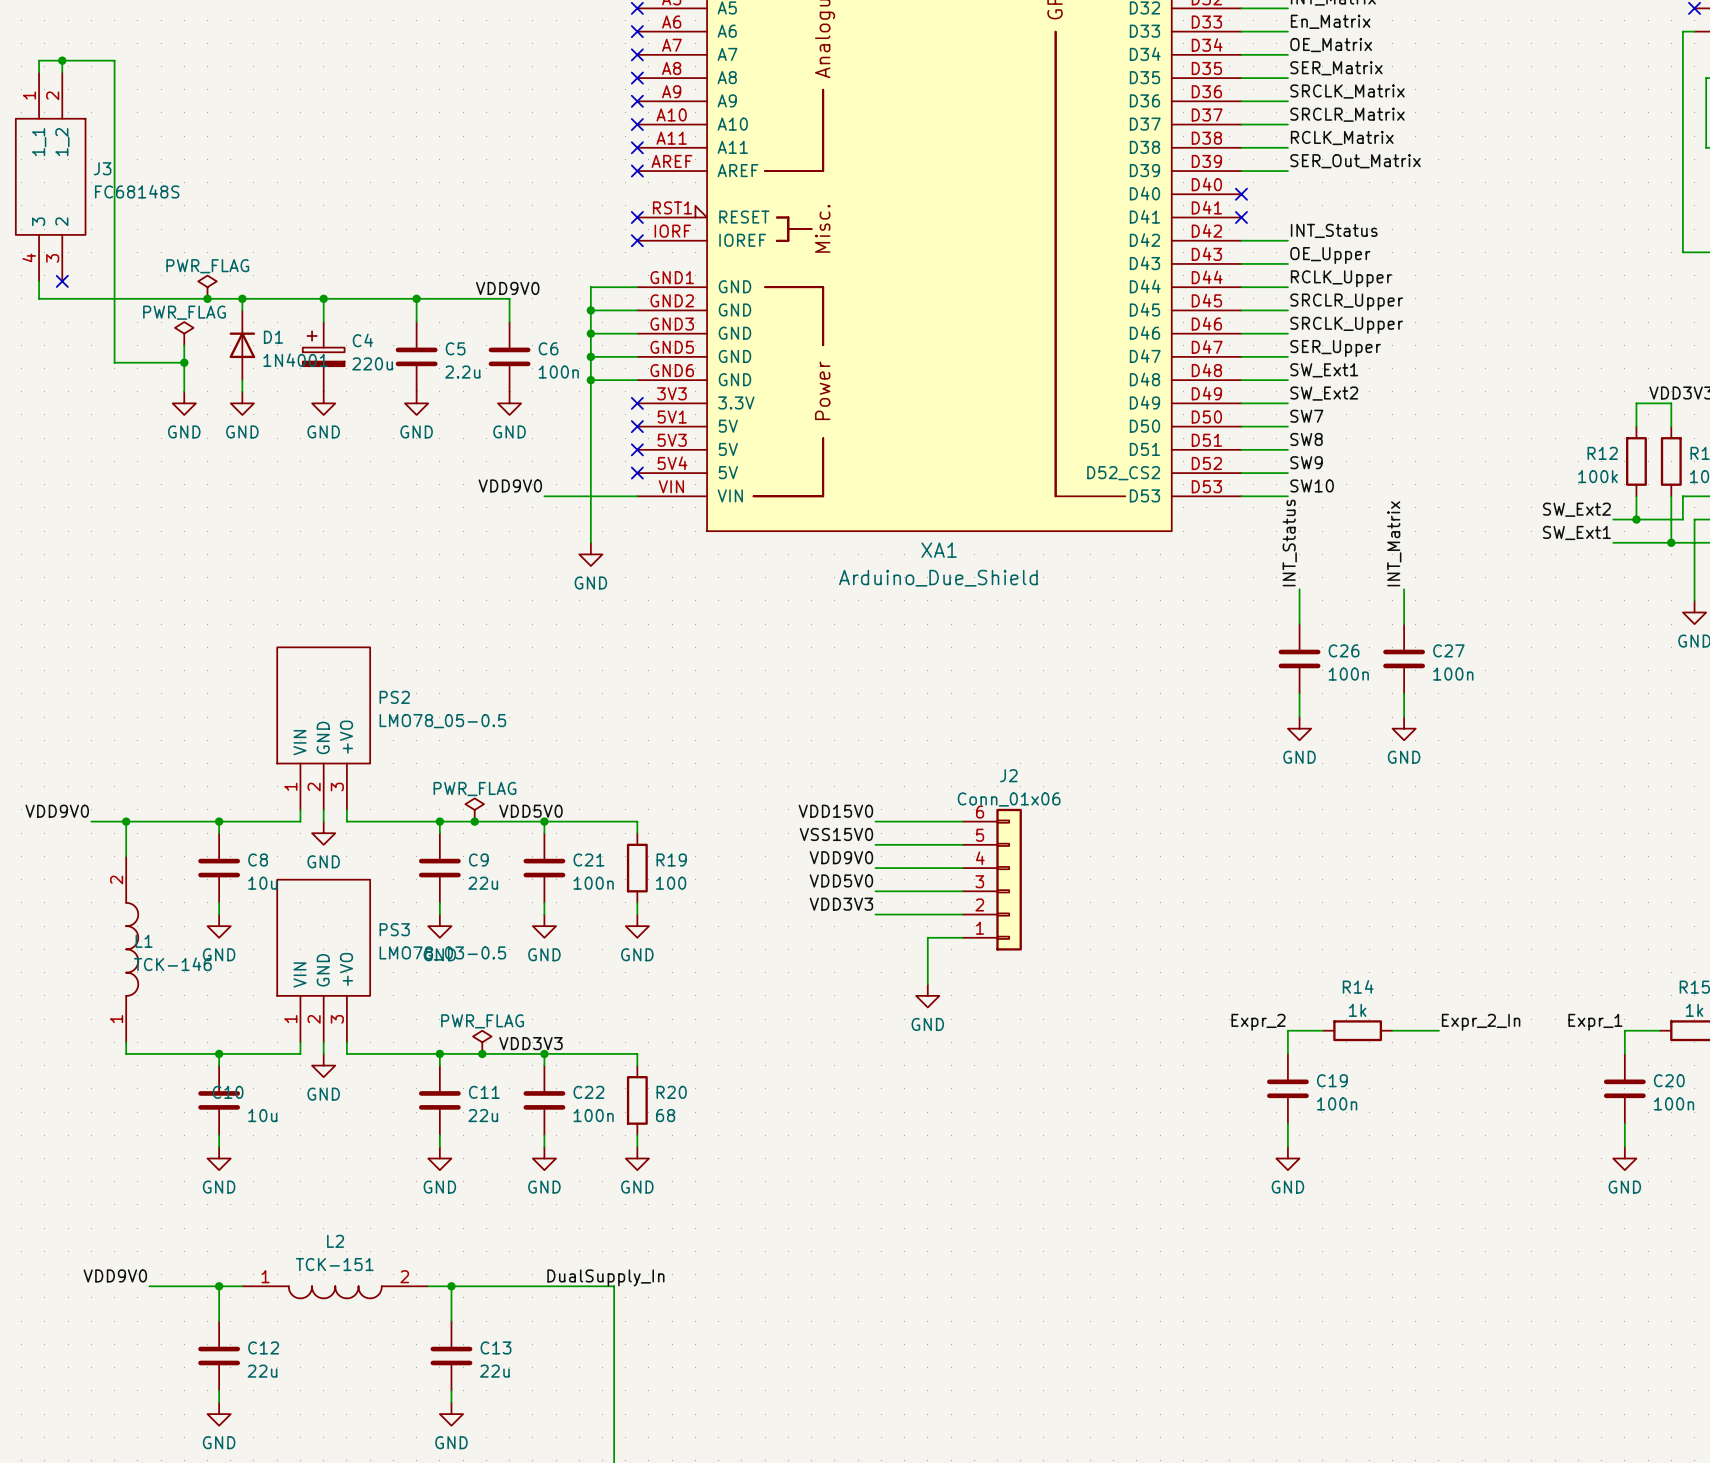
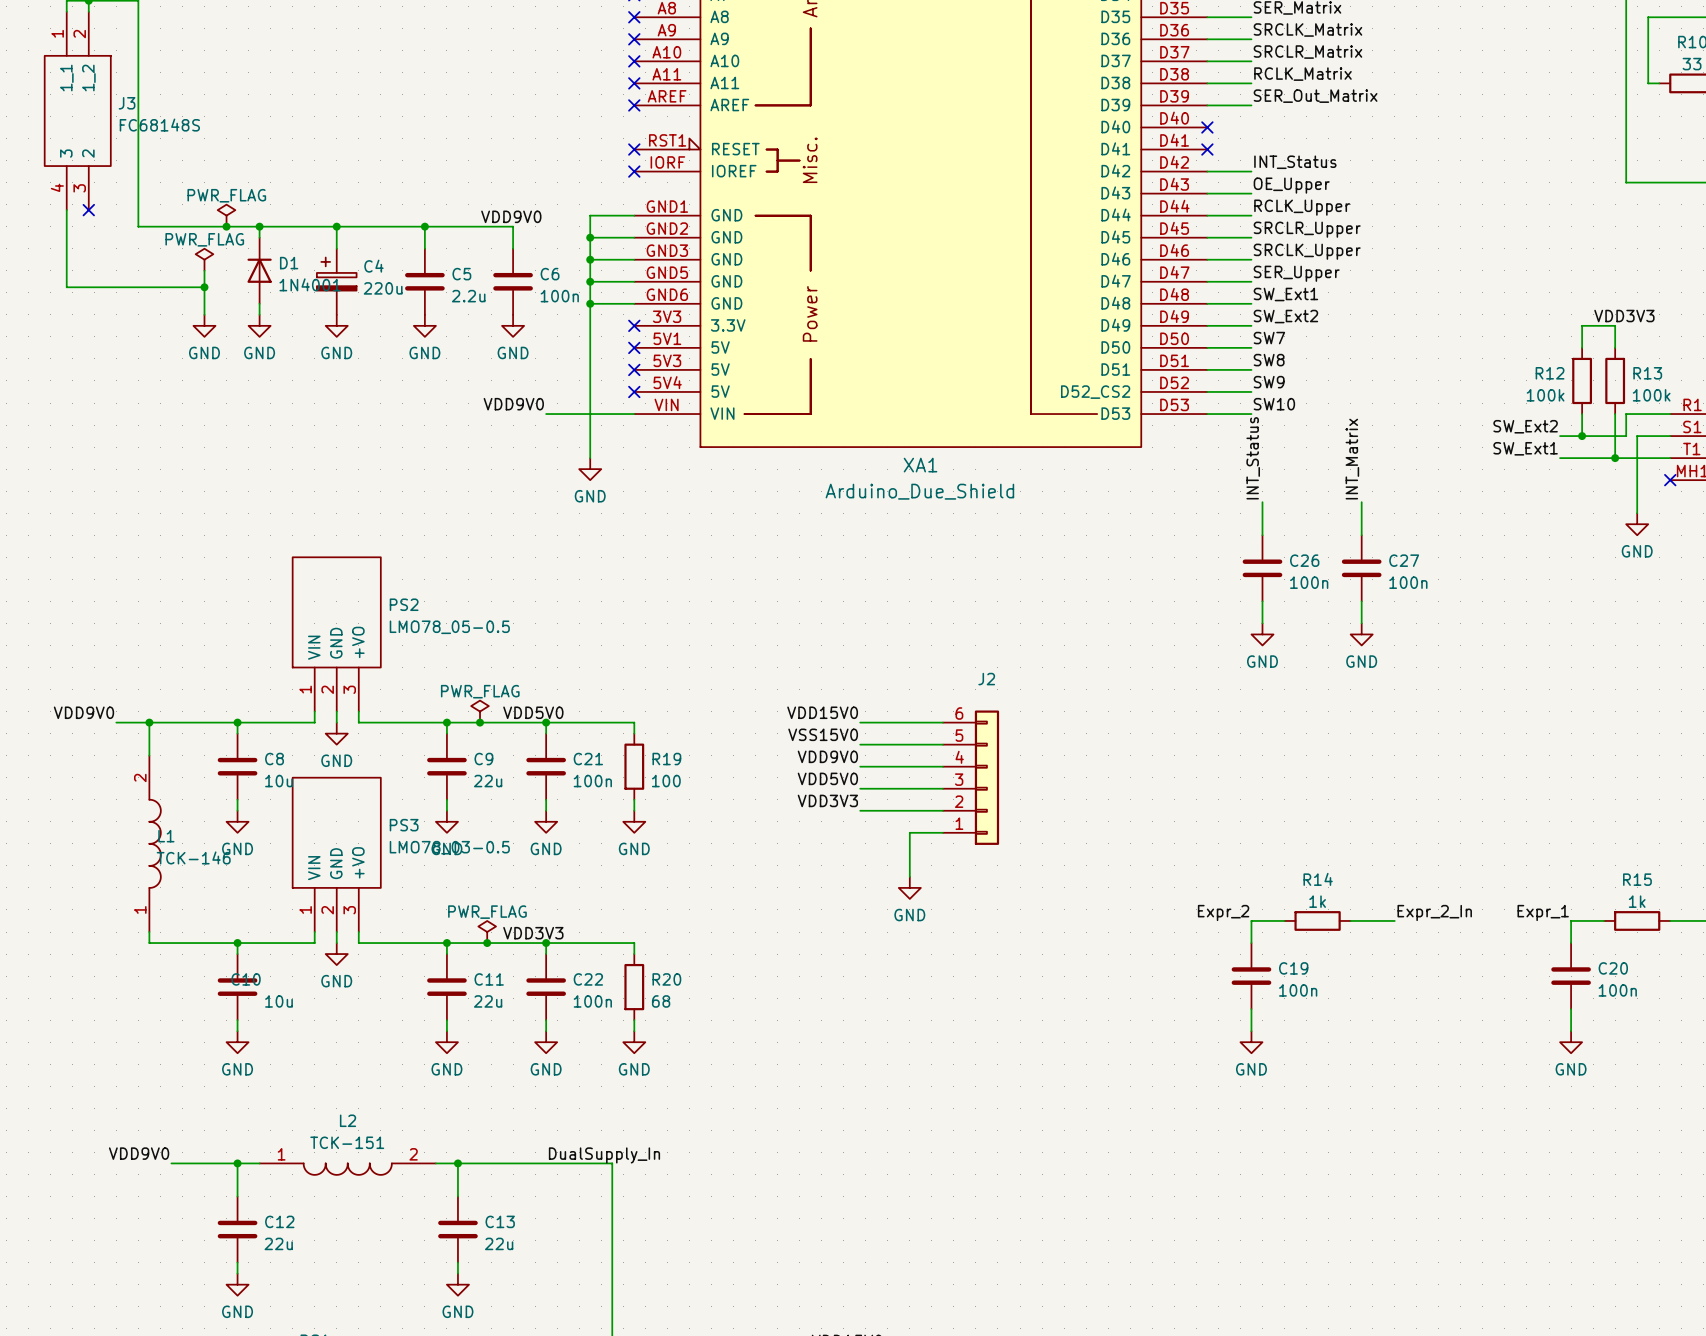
wire: (39, 298) (114, 298) (114, 362) -> (66, 226) (66, 287) (138, 287)
J2 value: Conn_01x06 (1009, 799) -> none

